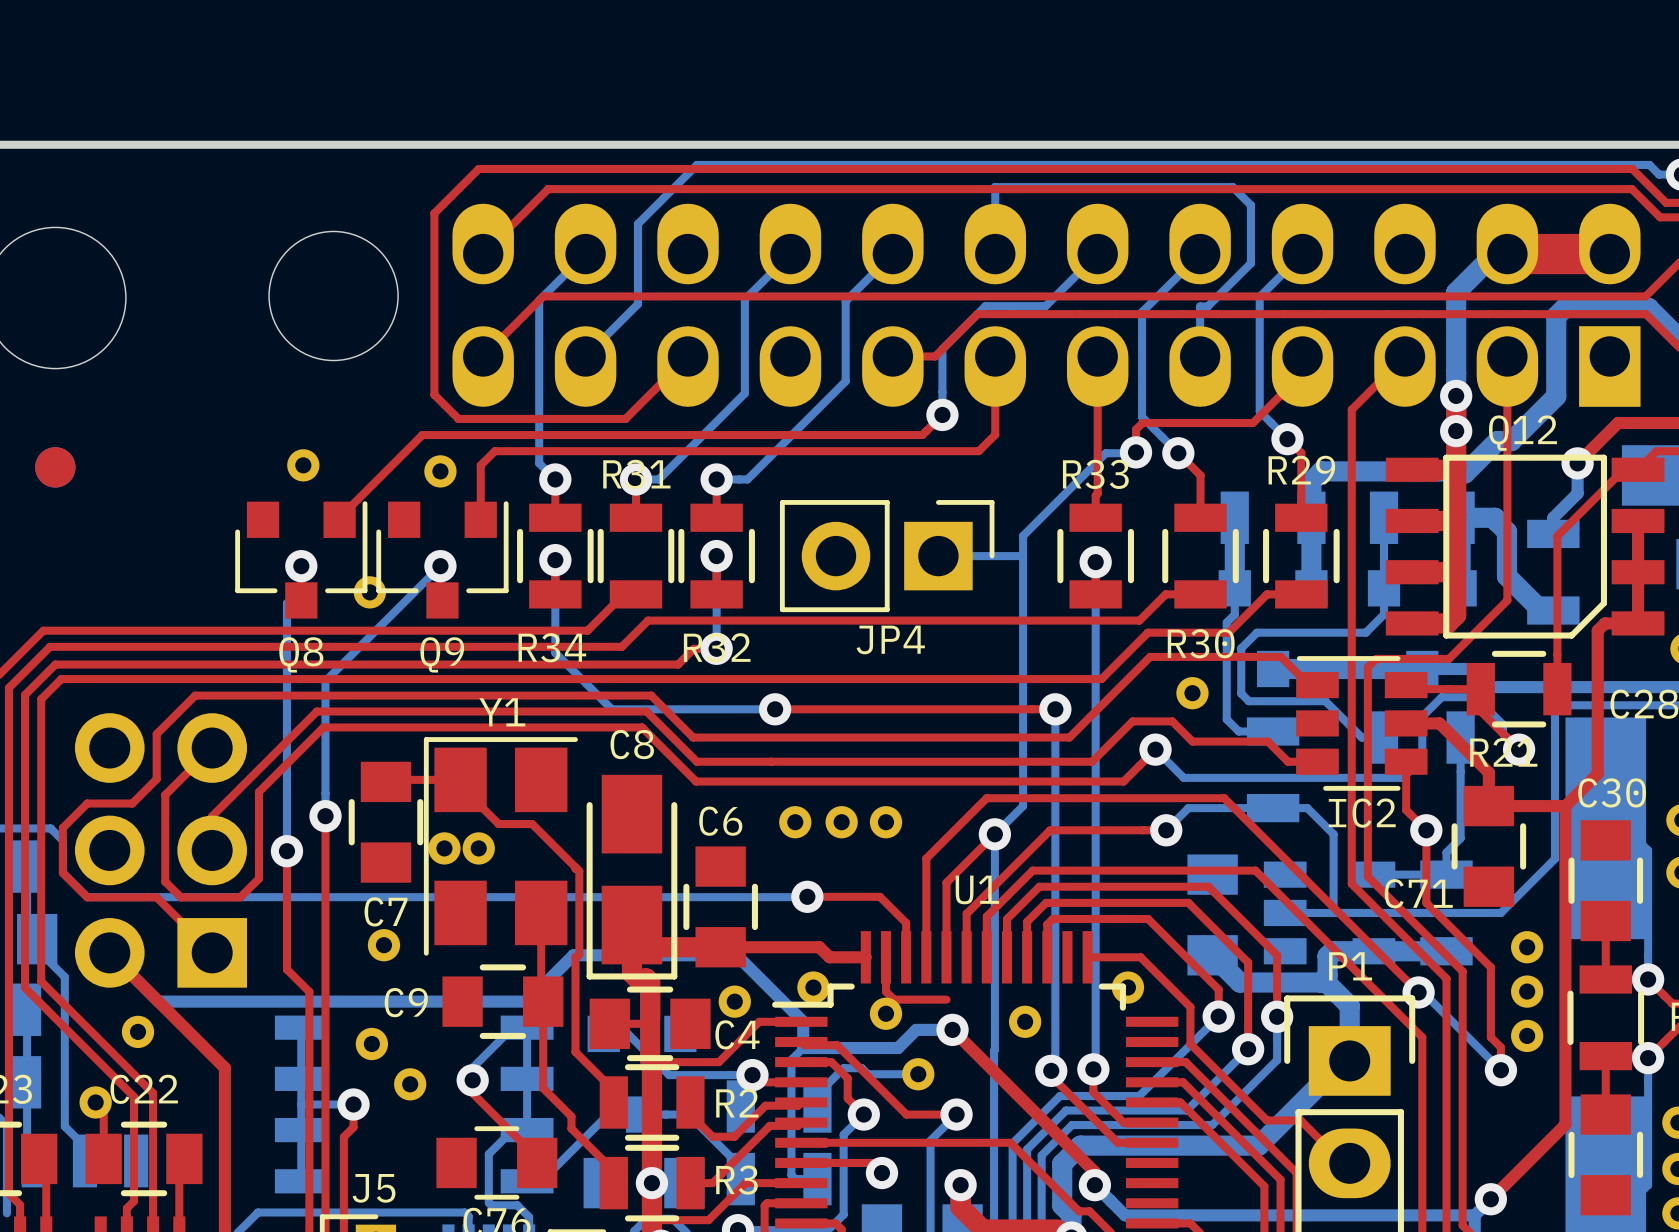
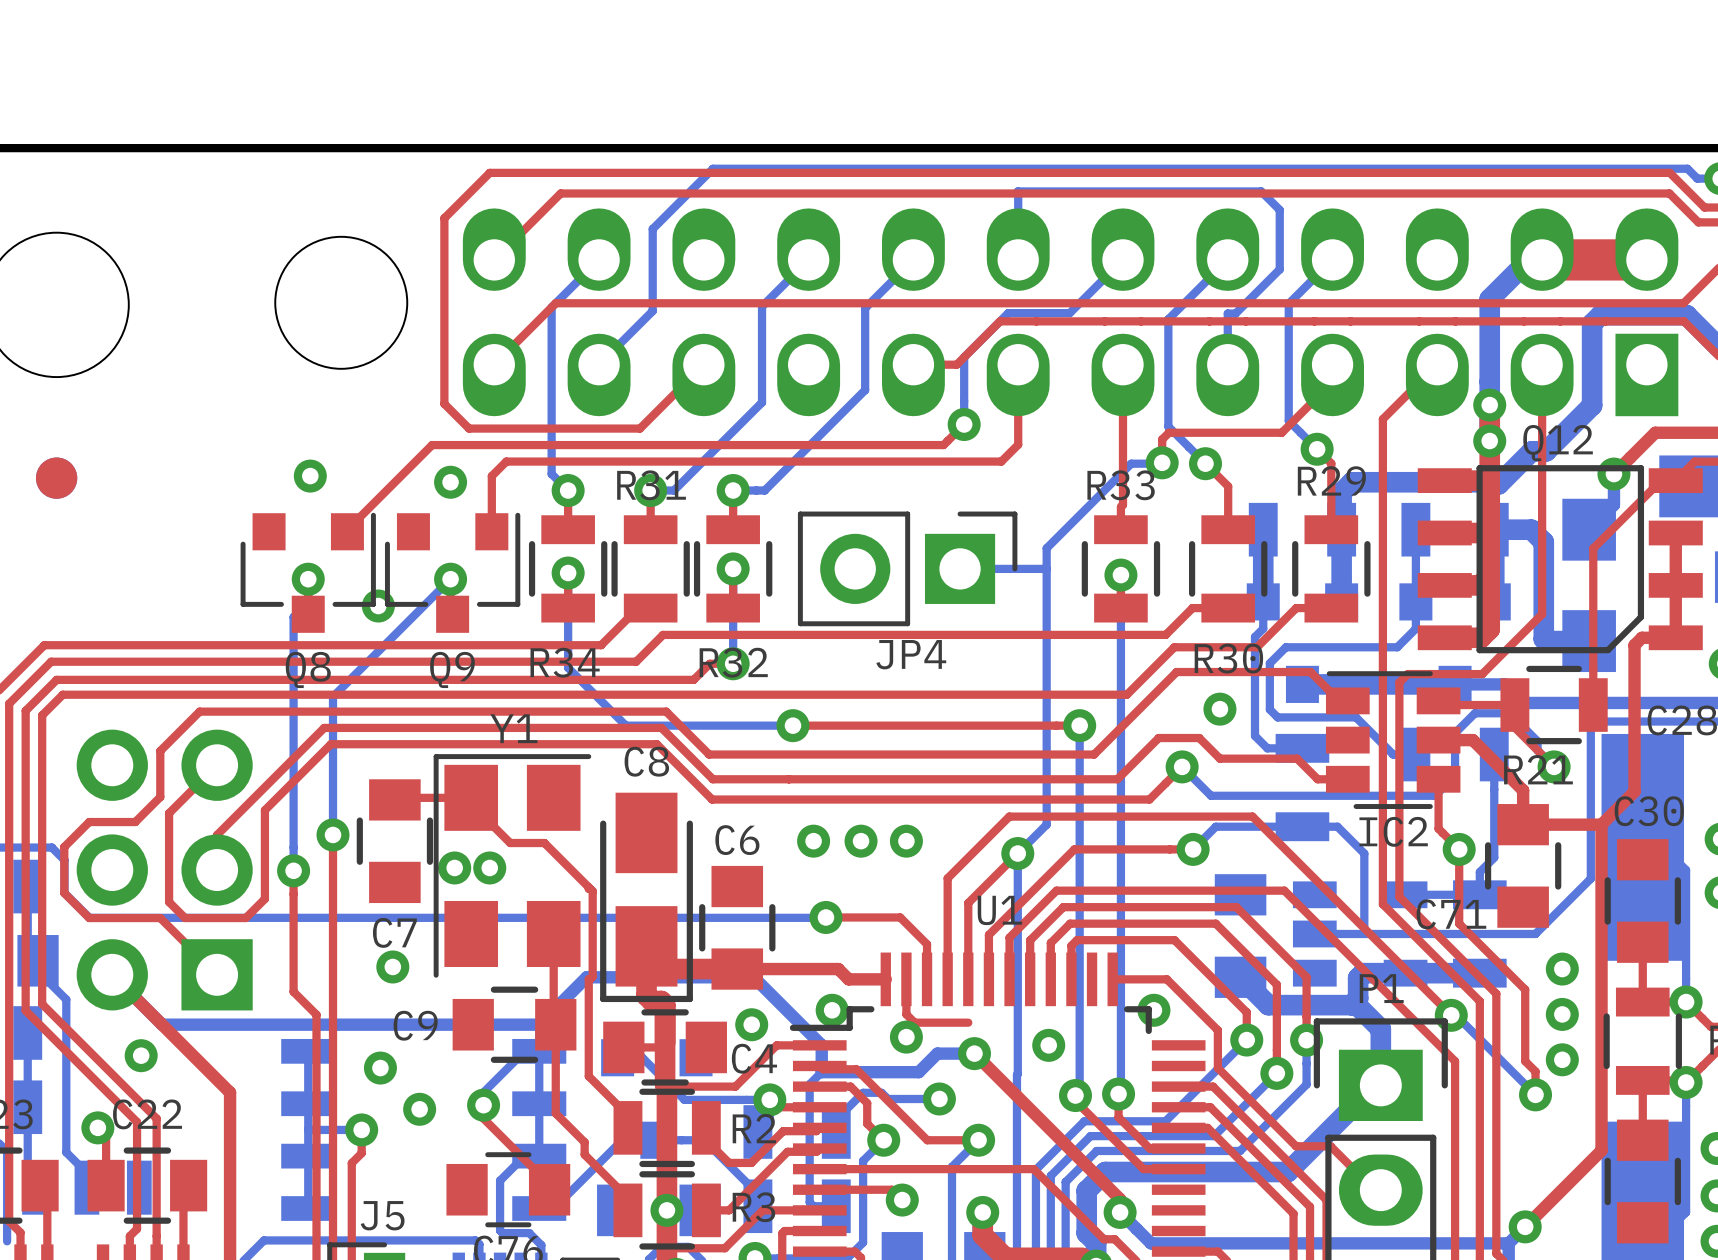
bottom track: (1494, 517) (1506, 531) (1506, 576) (1541, 610) (1553, 610) -> (1529, 529) (1543, 542) (1543, 639) (1545, 641) (1589, 641) (1589, 636)
part footprint: [1527, 519, 1580, 625] -> [1562, 498, 1616, 673]

